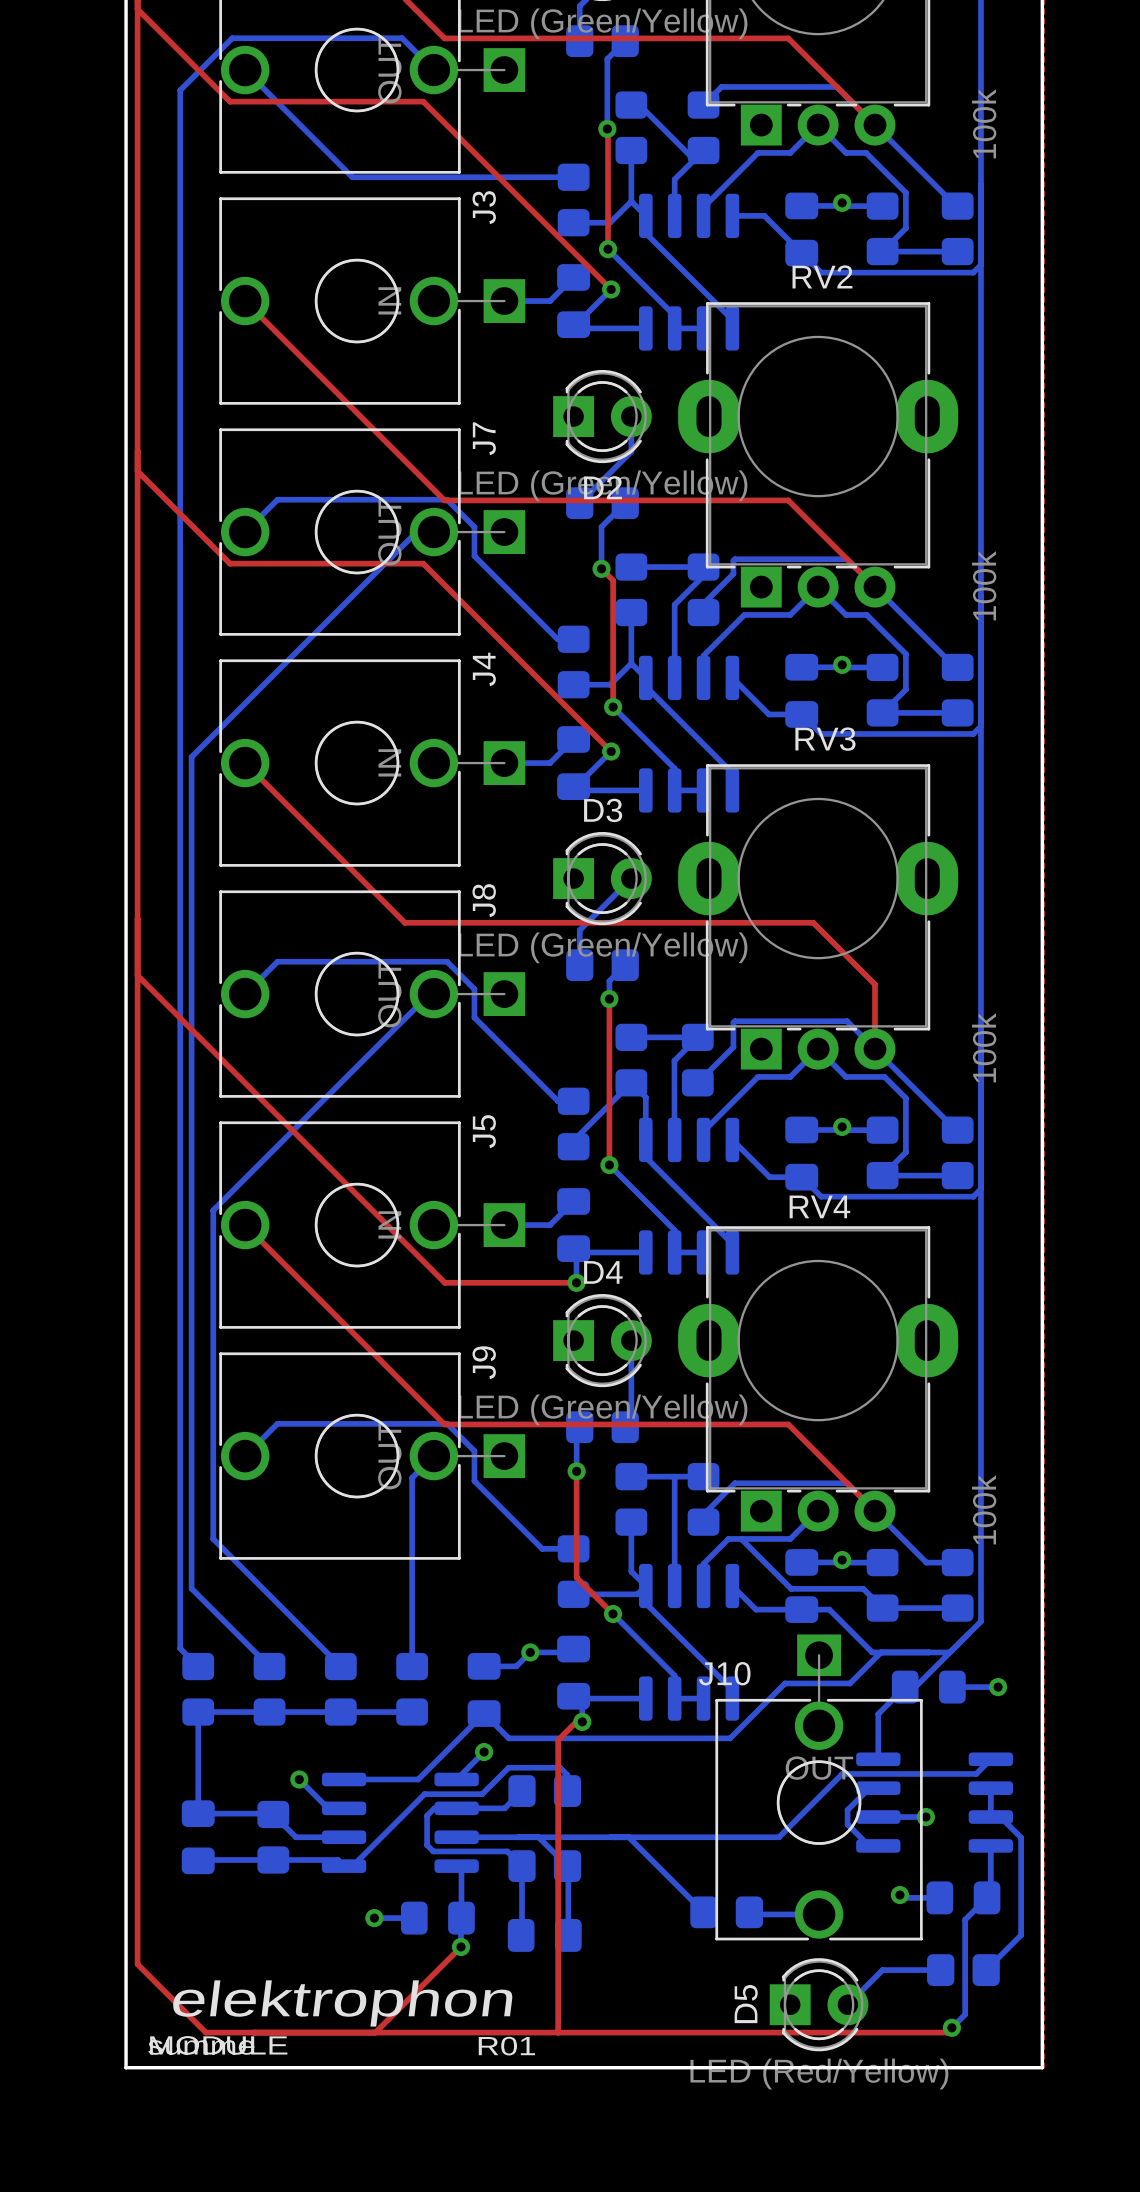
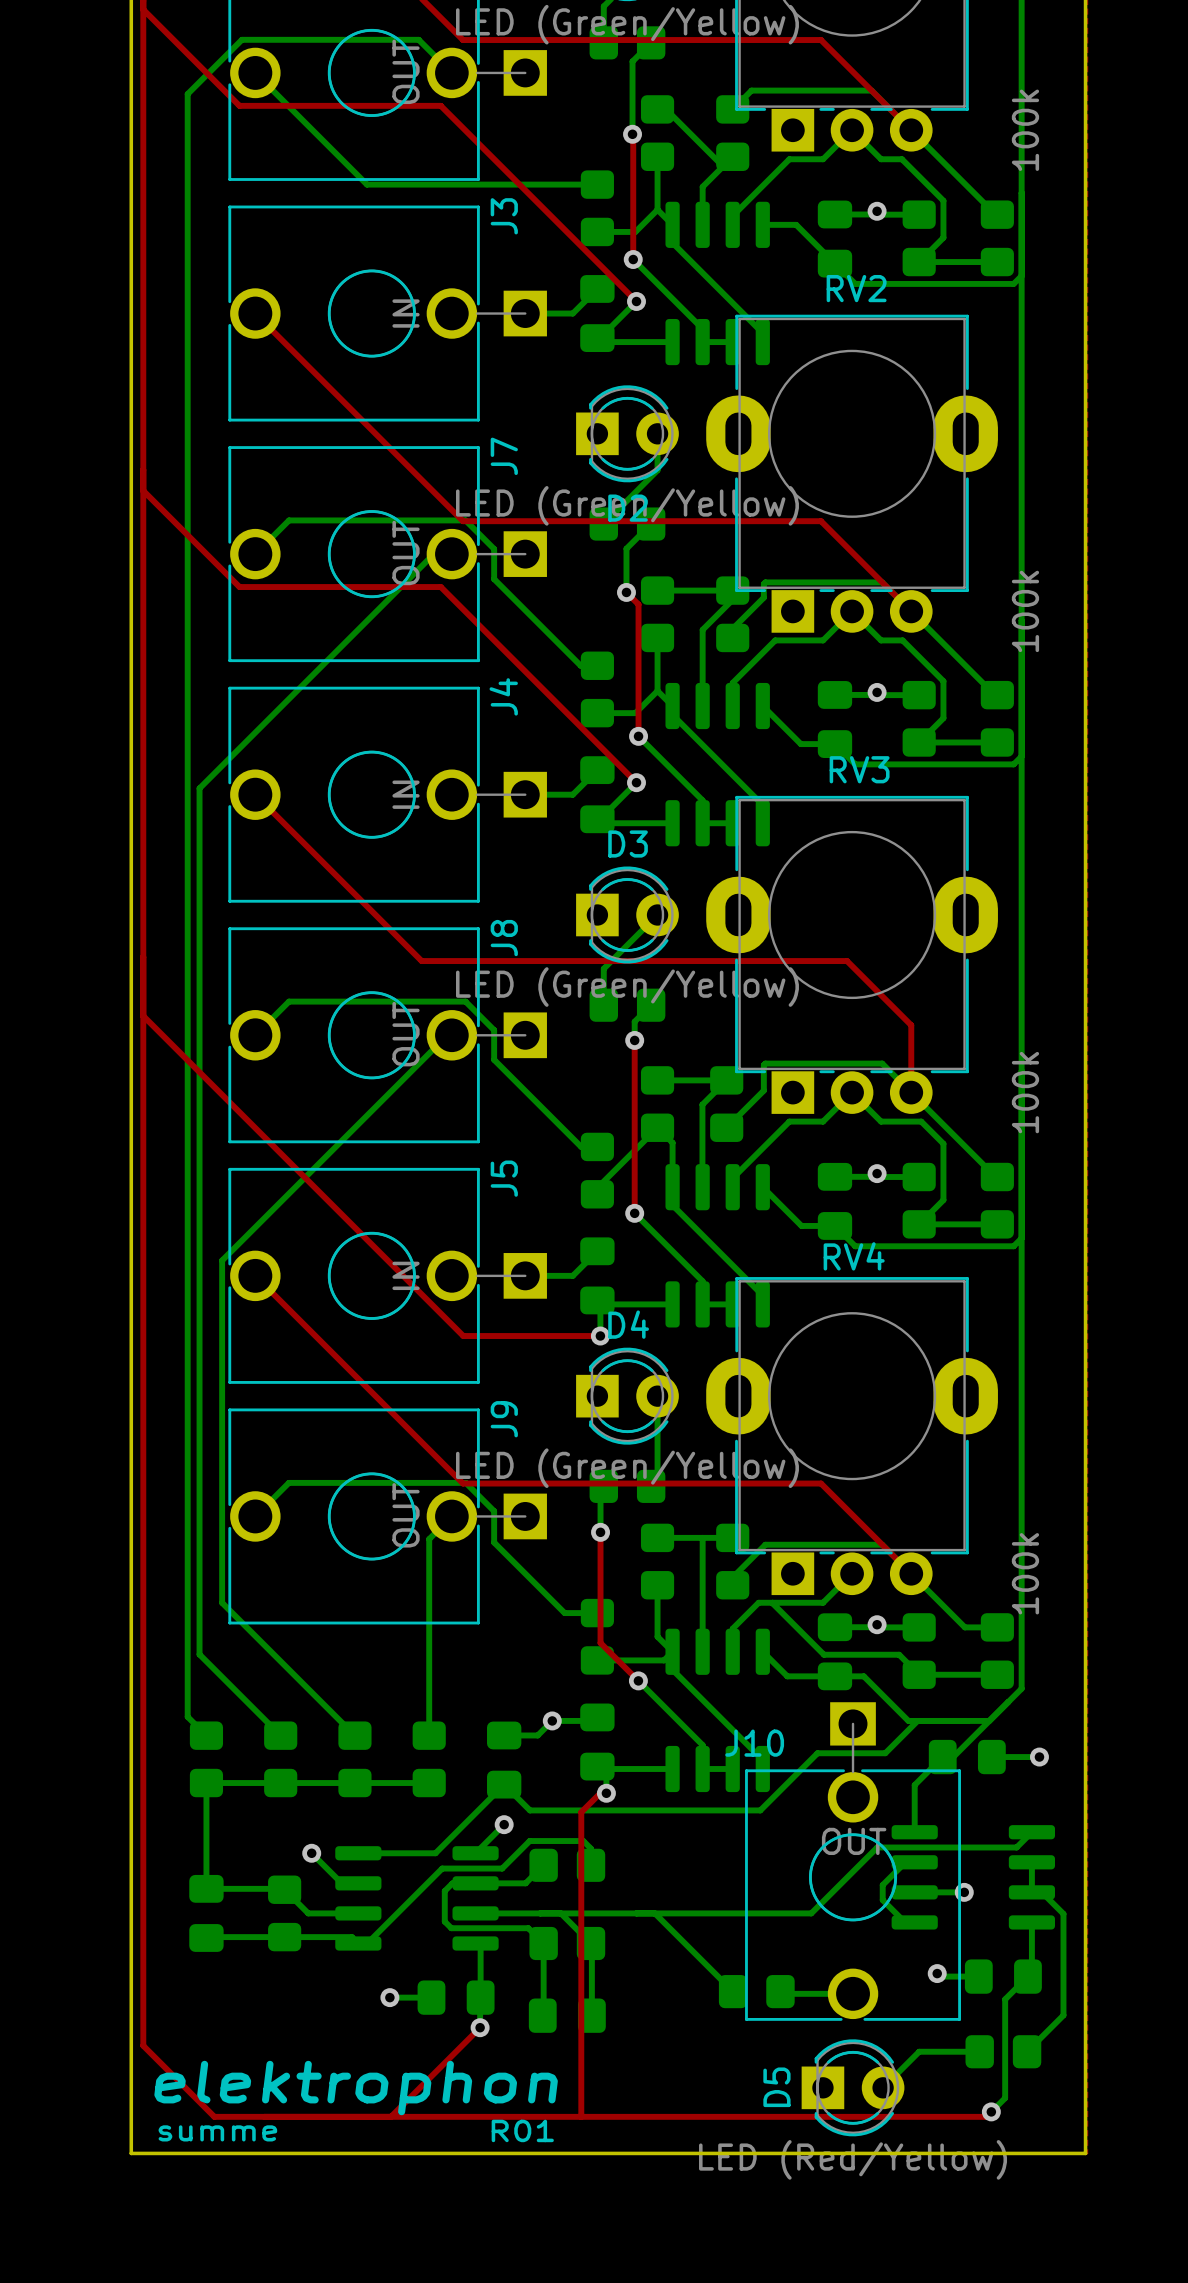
drawing shape: [148, 1980, 536, 2056] -> [154, 2060, 558, 2143]

